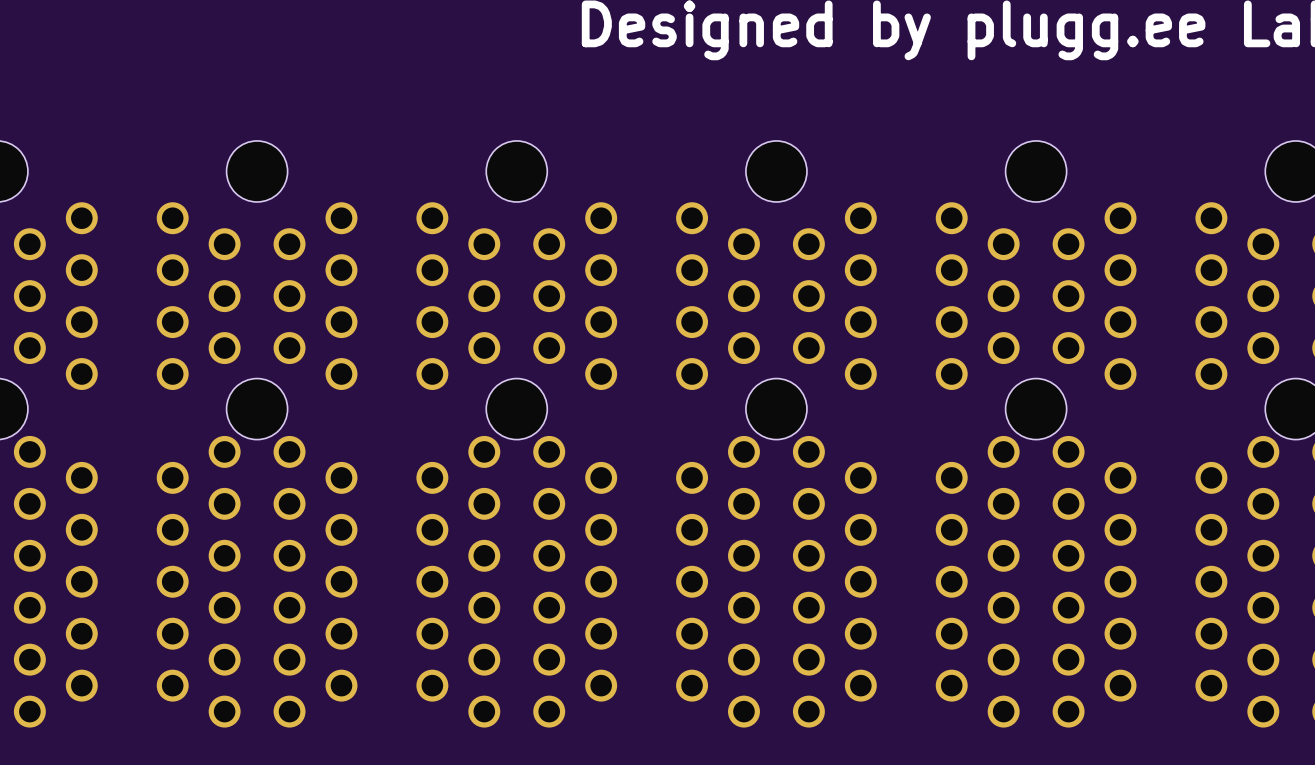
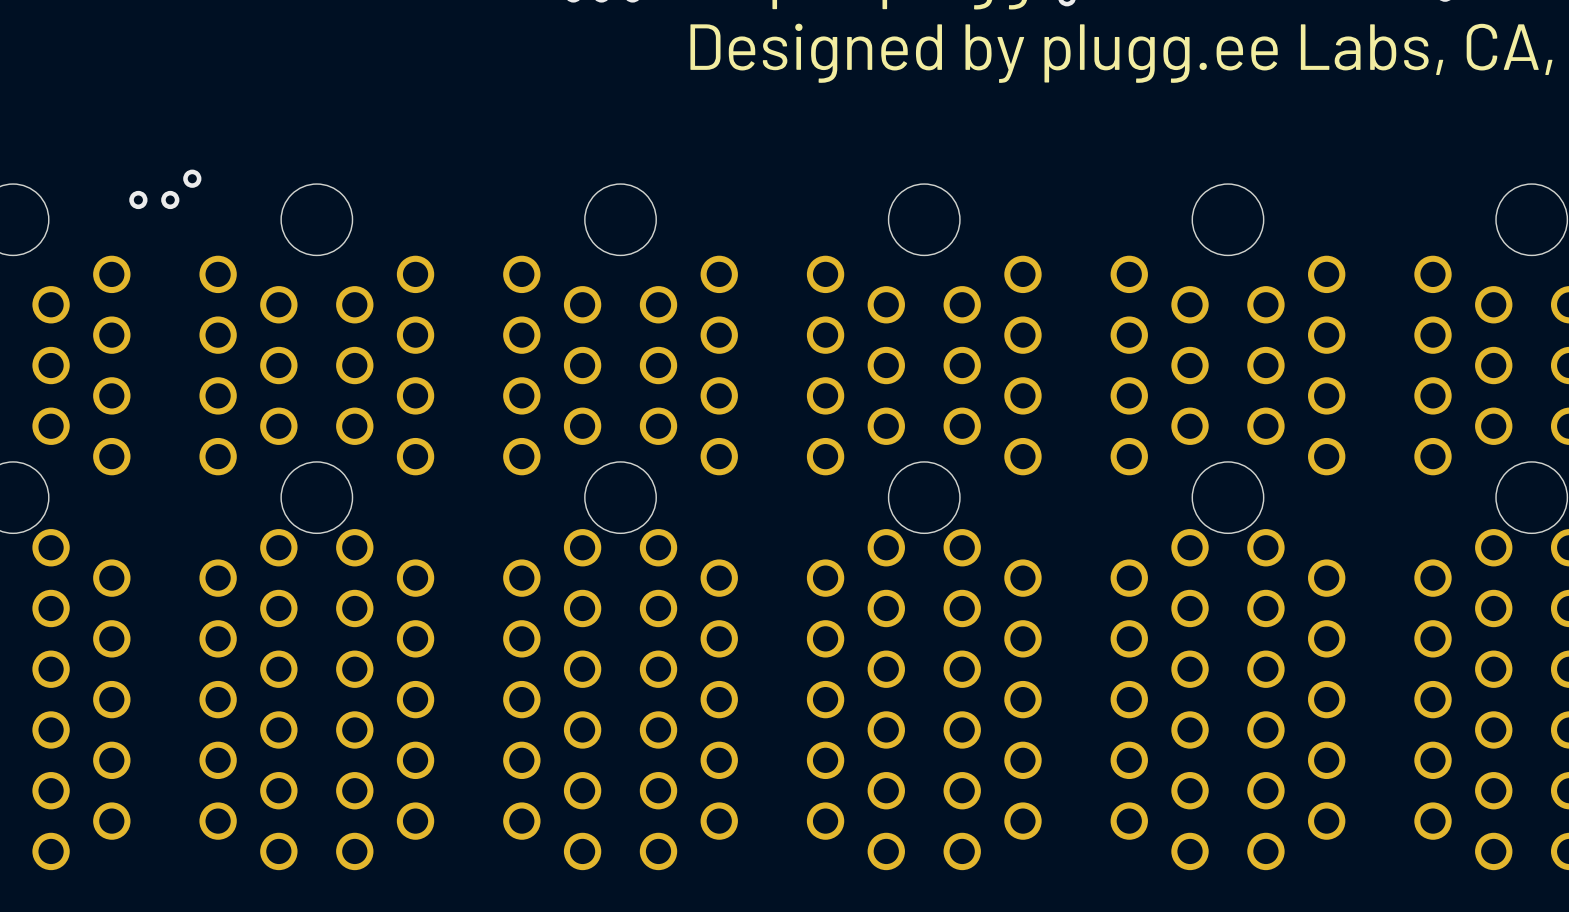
via: none -> (192, 178)
via: none -> (138, 199)
via: none -> (170, 199)

